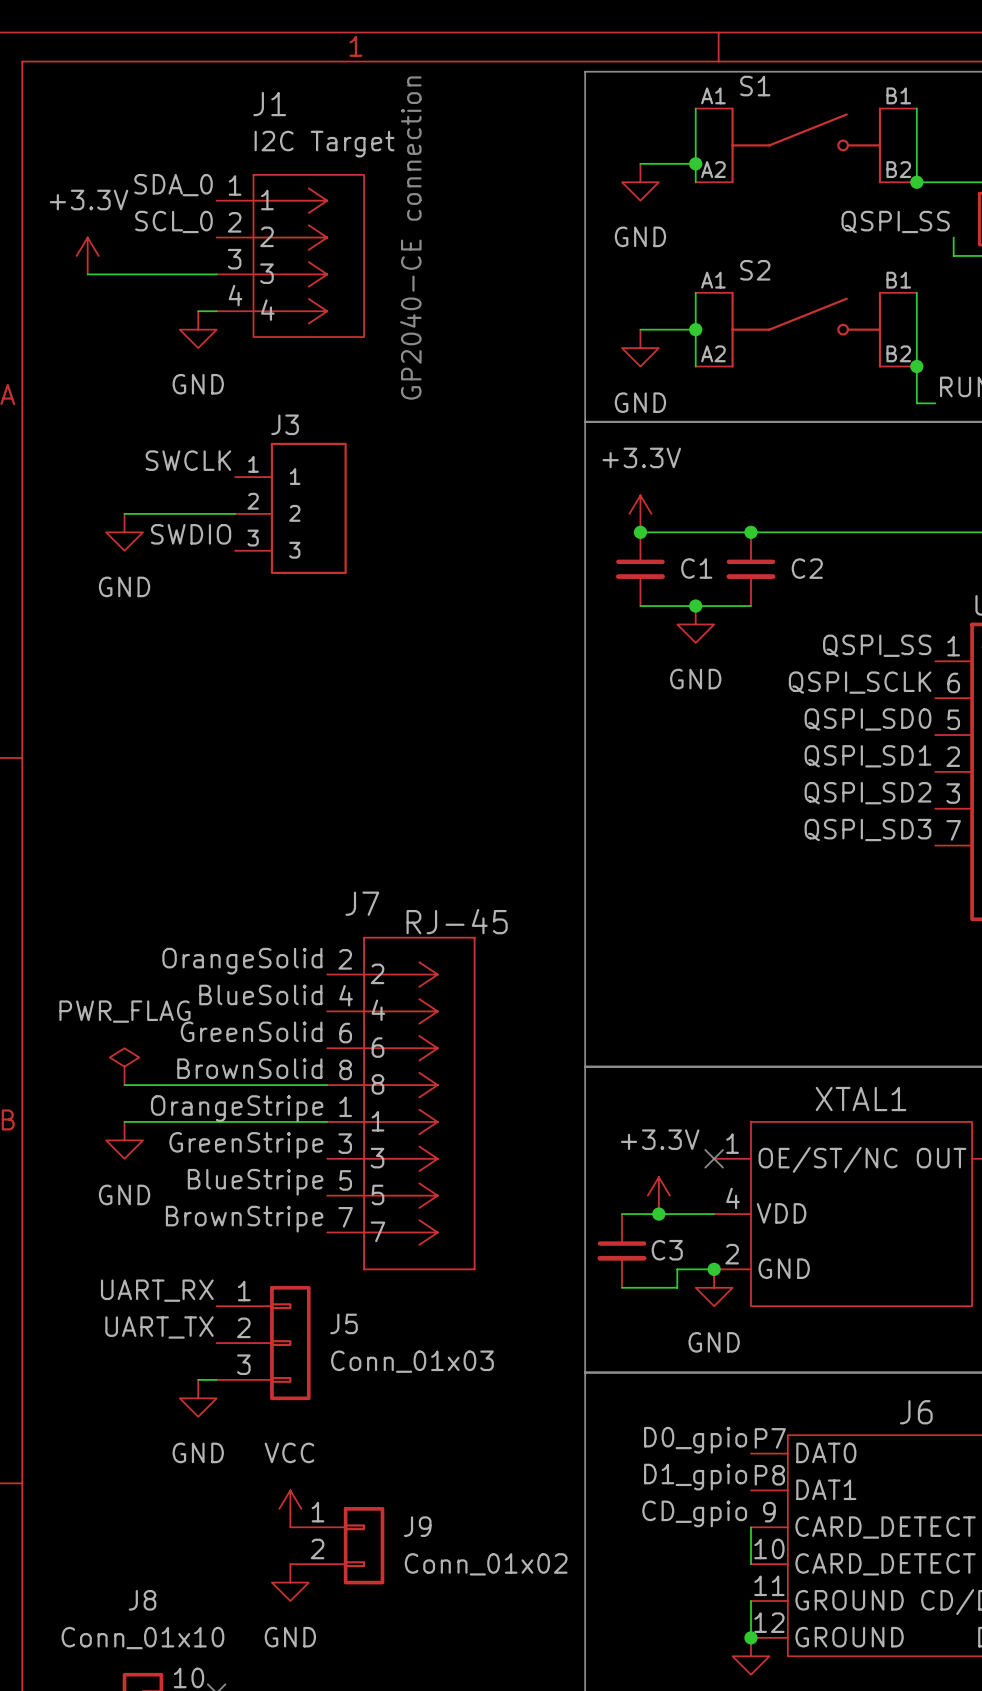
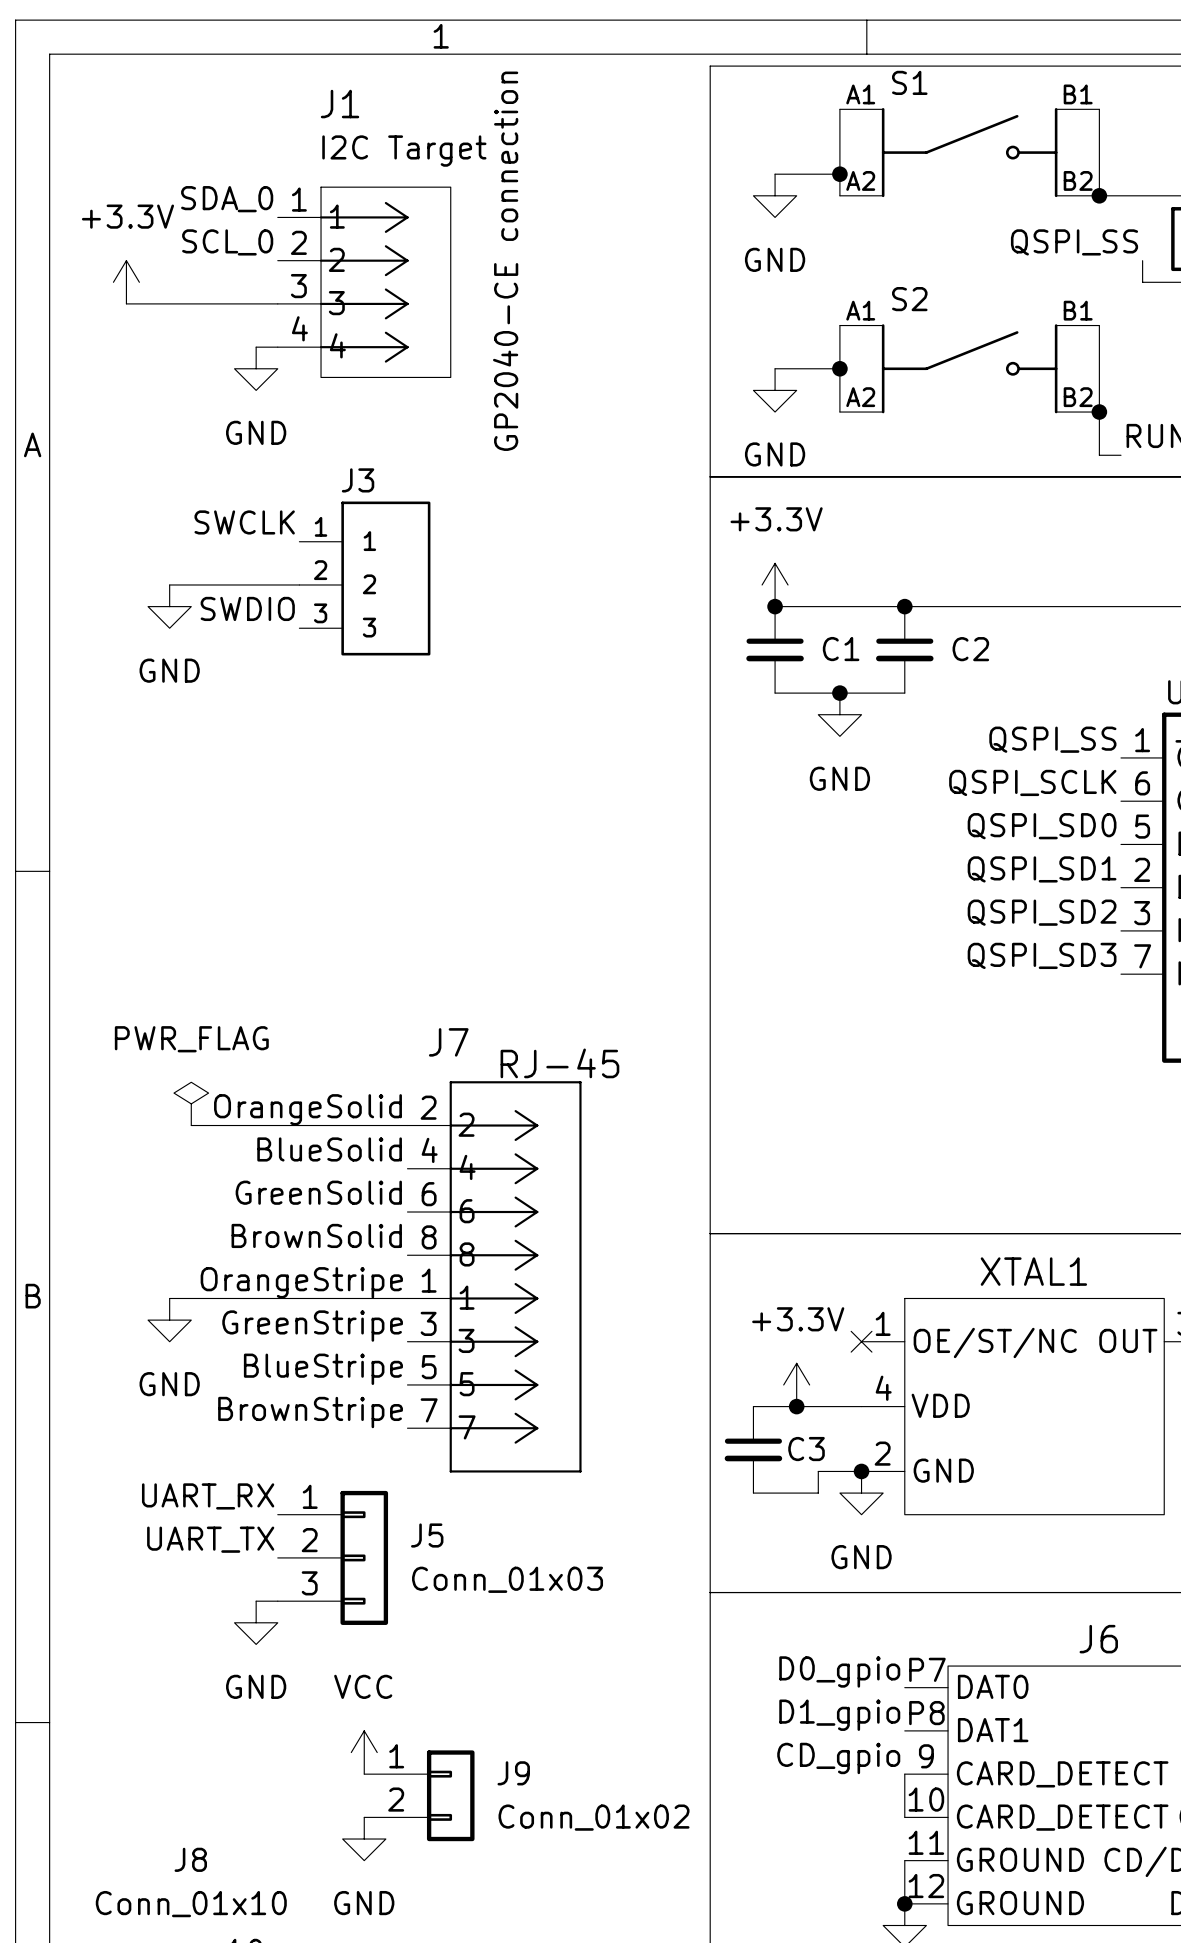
wire: none -> (191, 1125) (407, 1125)
power symbol position: PWR_FLAG (124, 1066) -> PWR_FLAG (191, 1103)
wire: (124, 1085) (327, 1085) -> none

